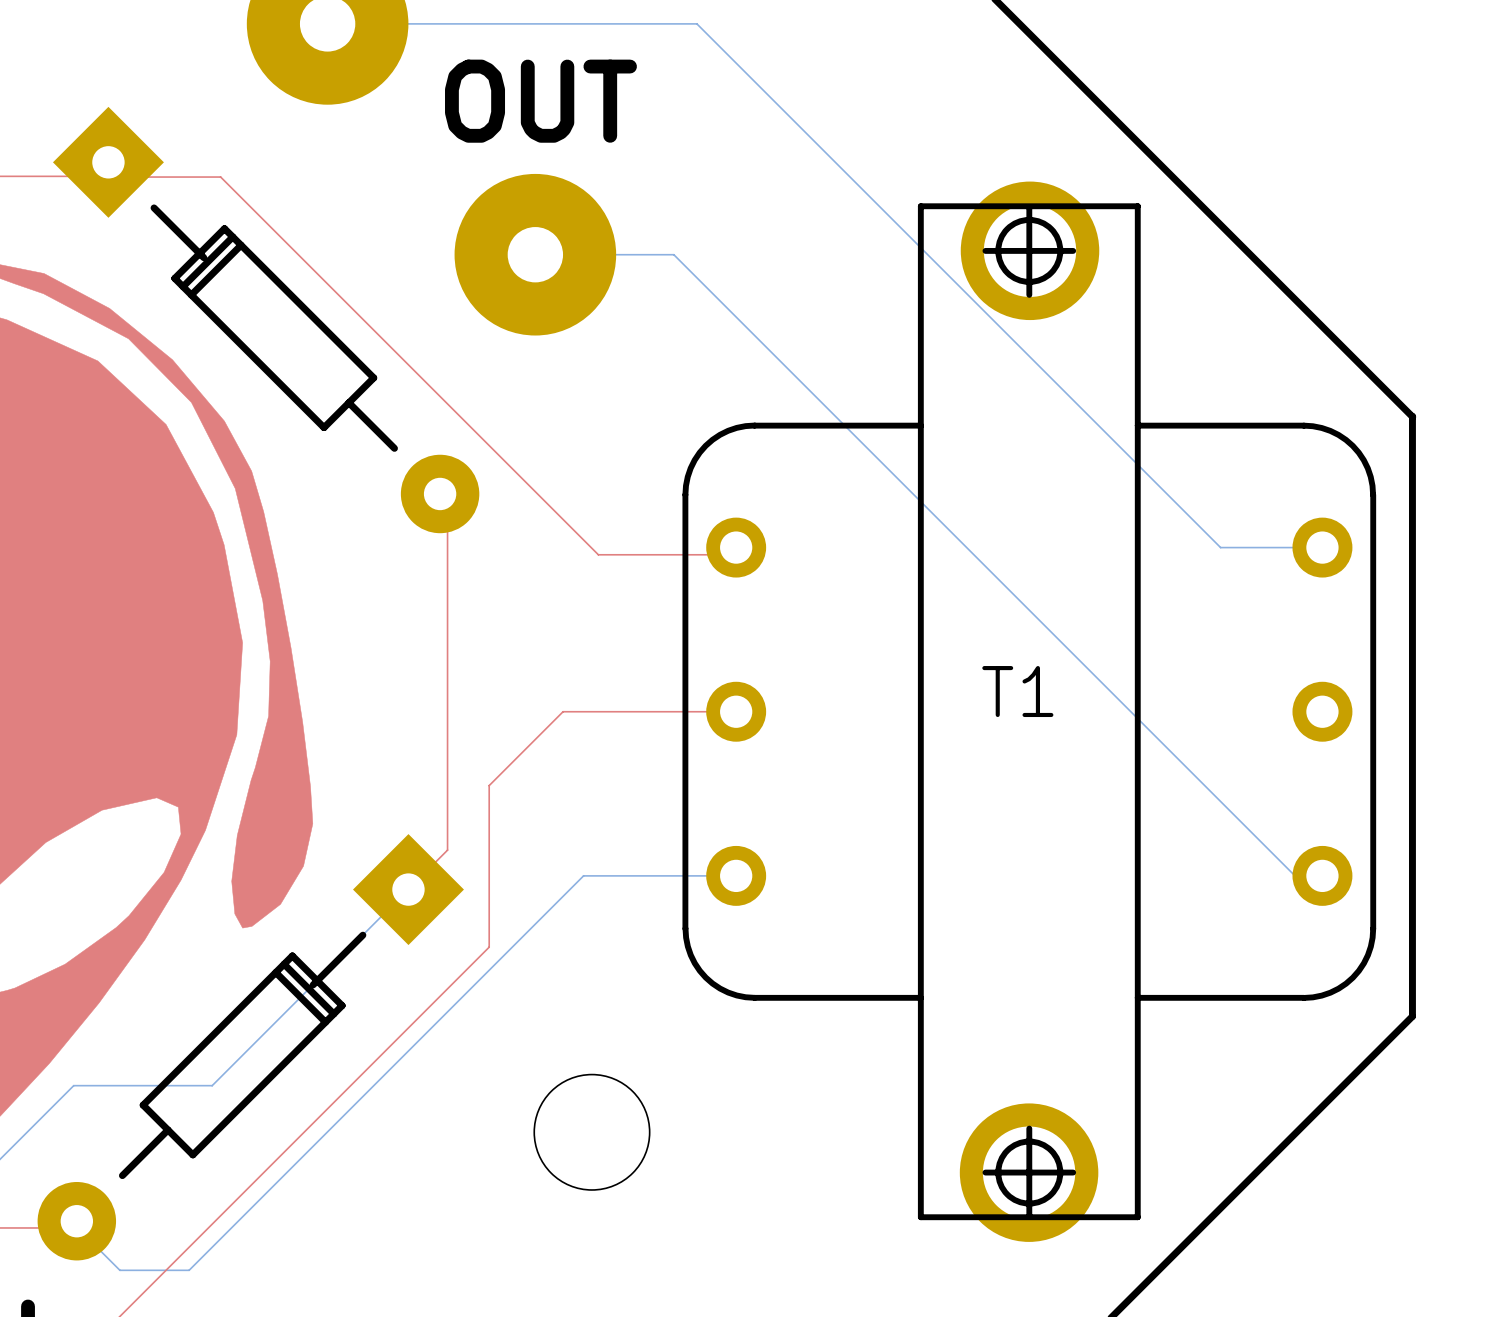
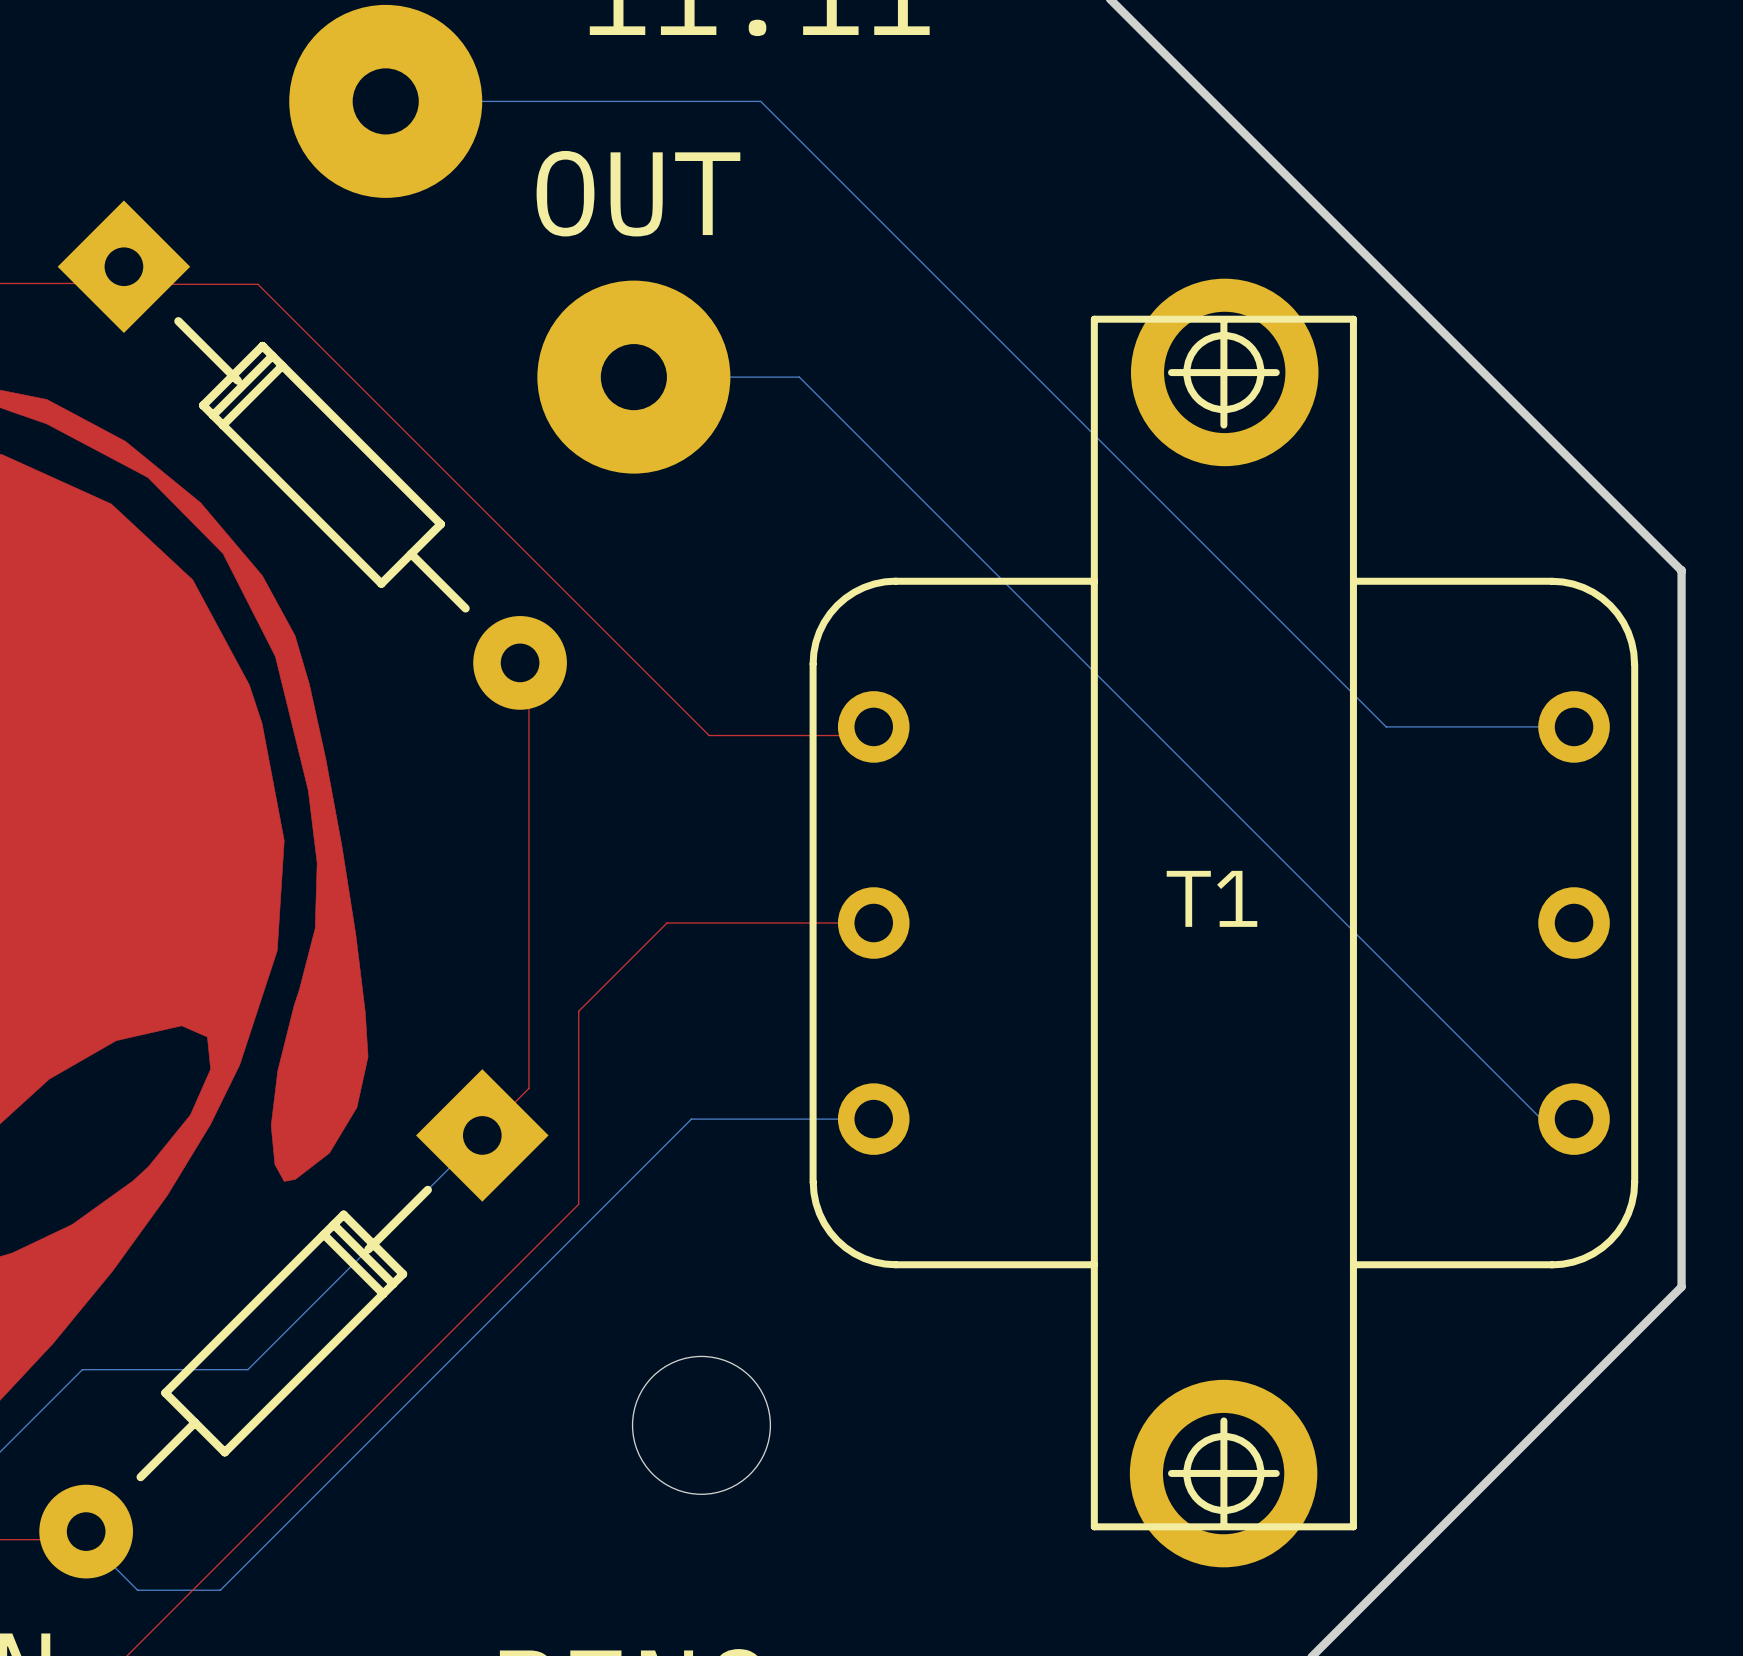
bottom track: (641, 23) (696, 23) (1220, 547) -> (760, 101) (1386, 726) (1452, 726)
T1 footprint: [682, 181, 1377, 1242] -> [809, 278, 1639, 1568]

